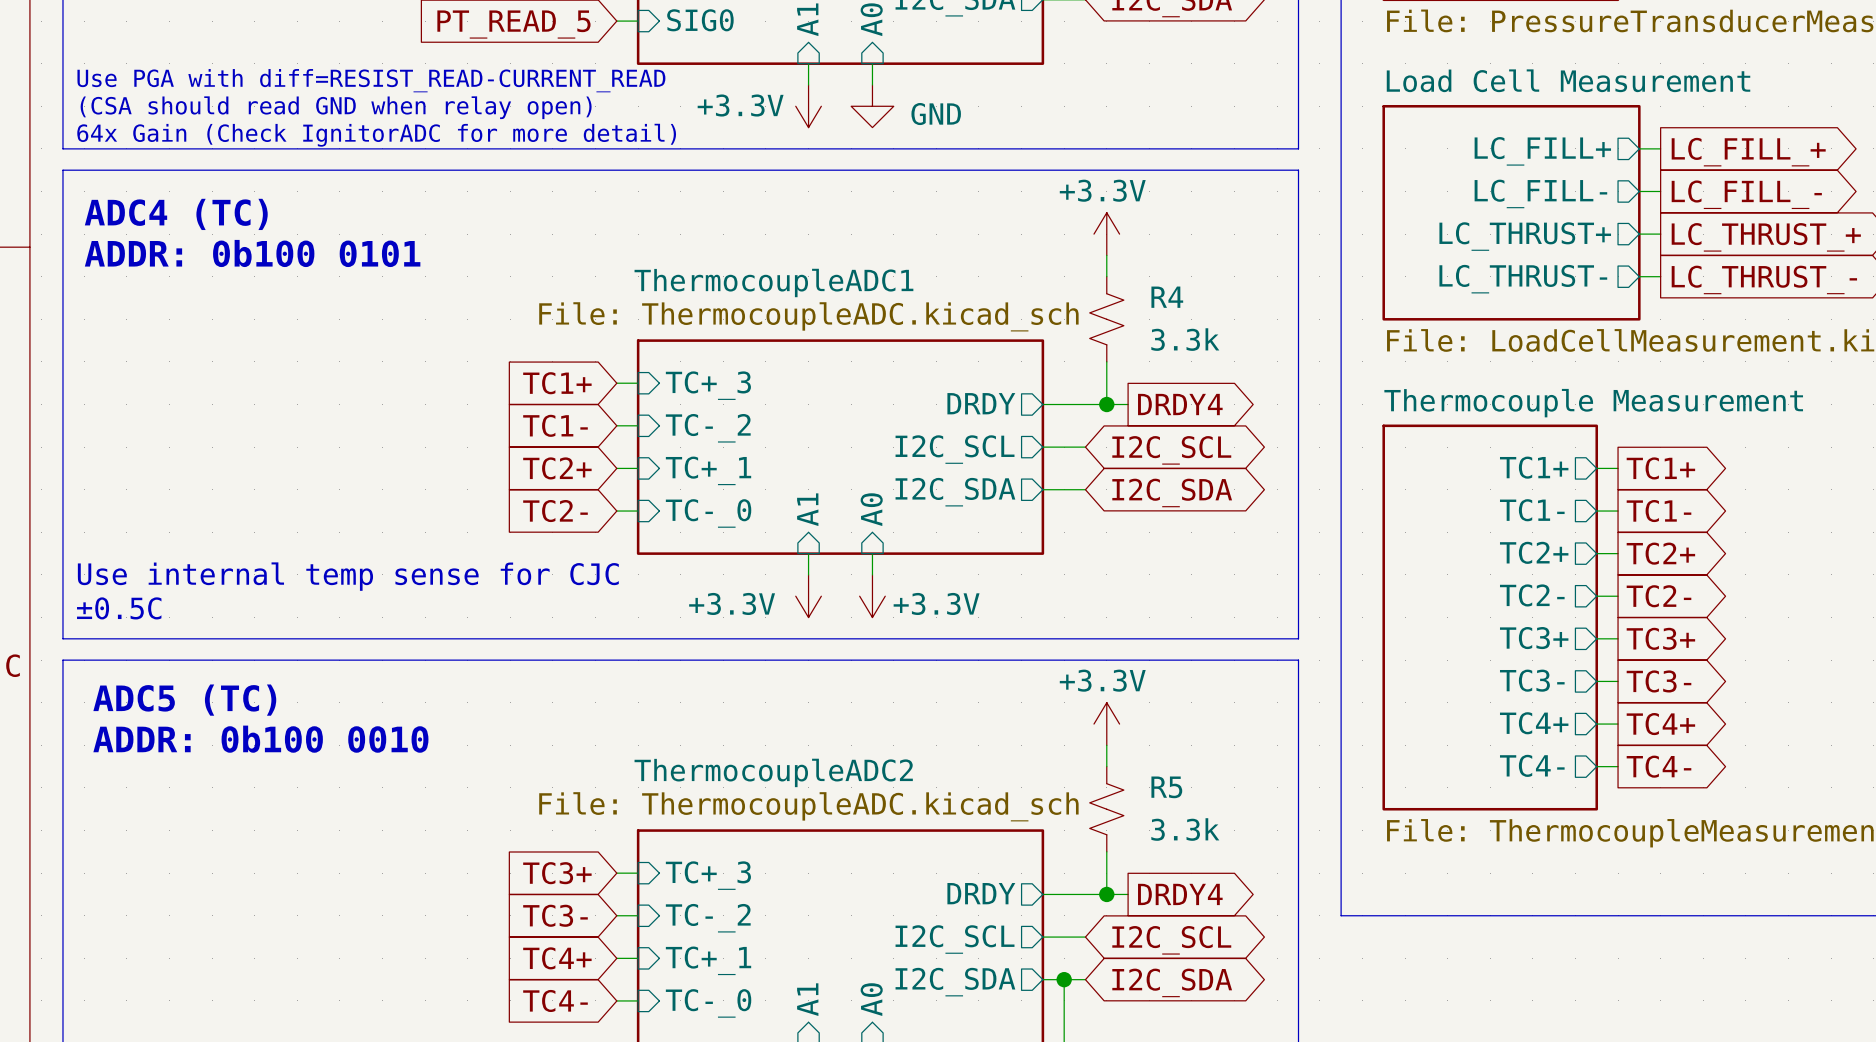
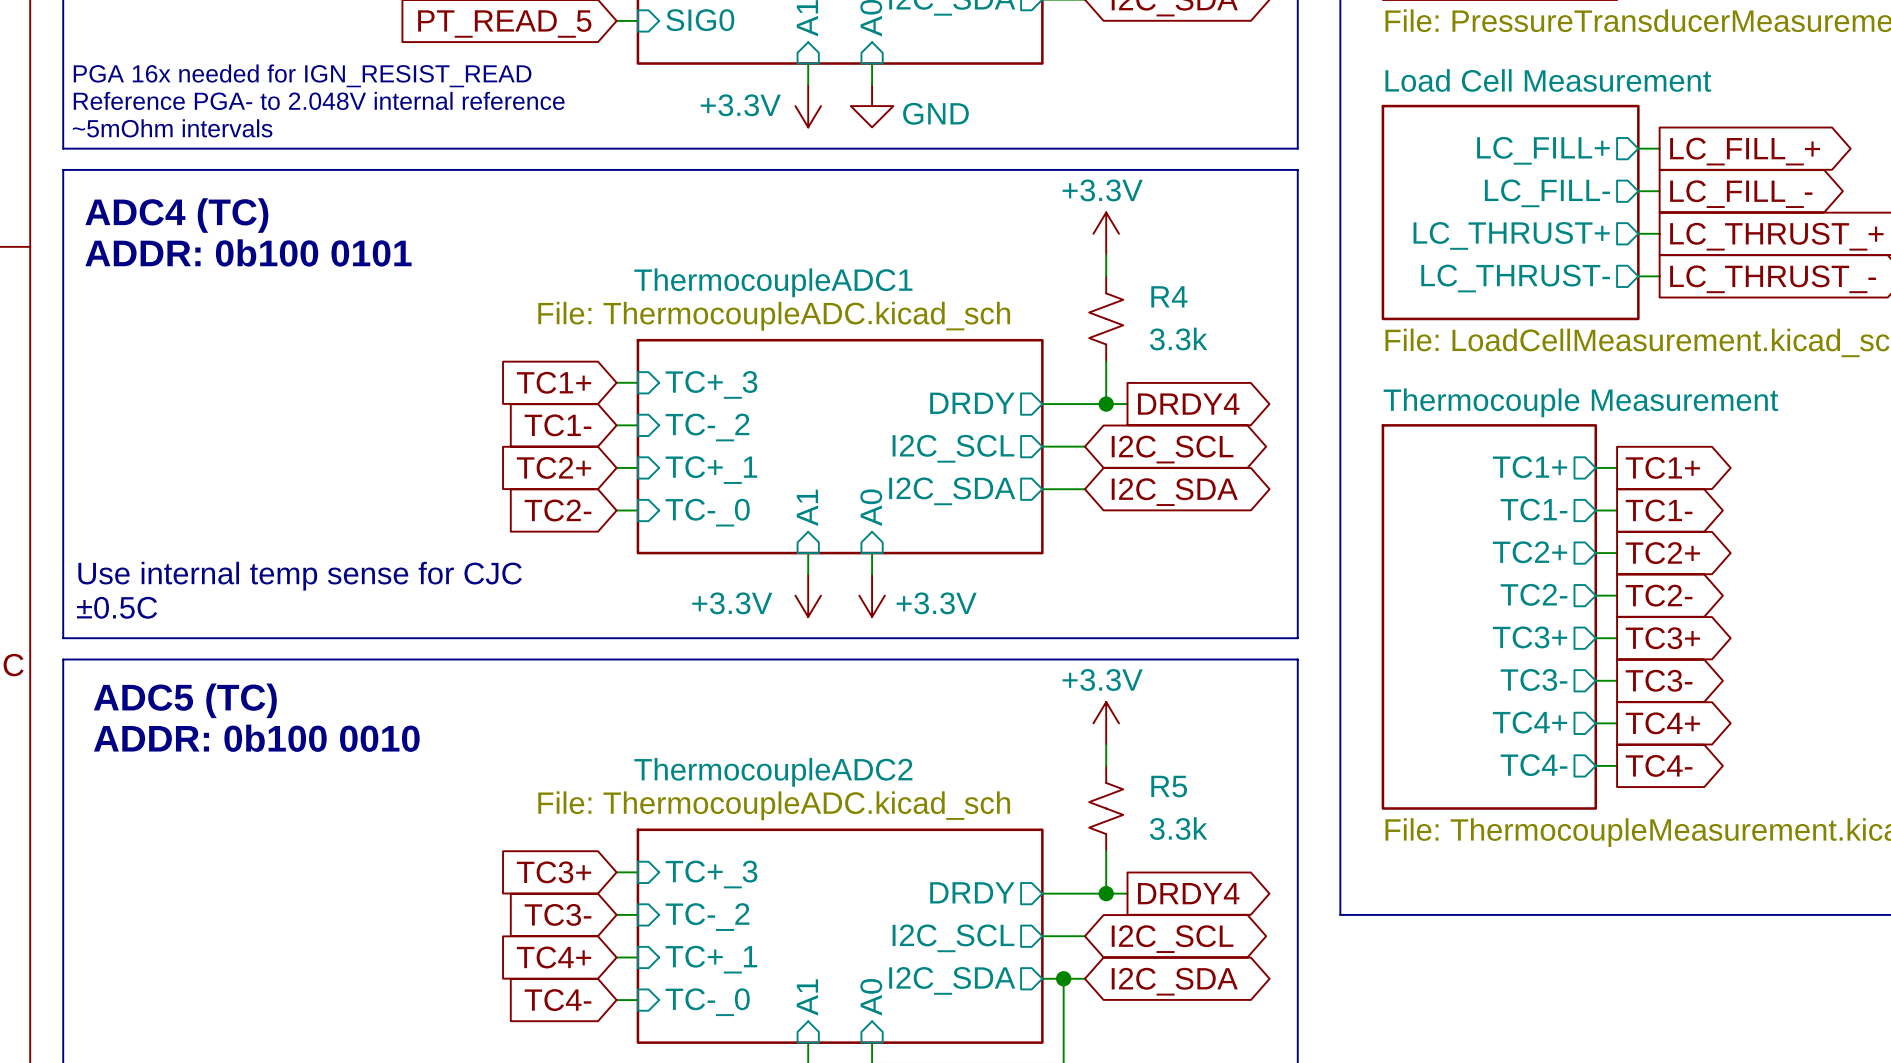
text: Use PGA with diff=RESIST_READ-CURRENT_READ (371, 80) -> PGA 16x needed for IGN_RESIST_READ (302, 75)
text: (CSA should read GND when relay open) (336, 107) -> Reference PGA- to 2.048V internal reference (319, 100)
text: 64x Gain (Check IgnitorADC for more detail) (376, 135) -> ~5mOhm intervals (172, 128)

